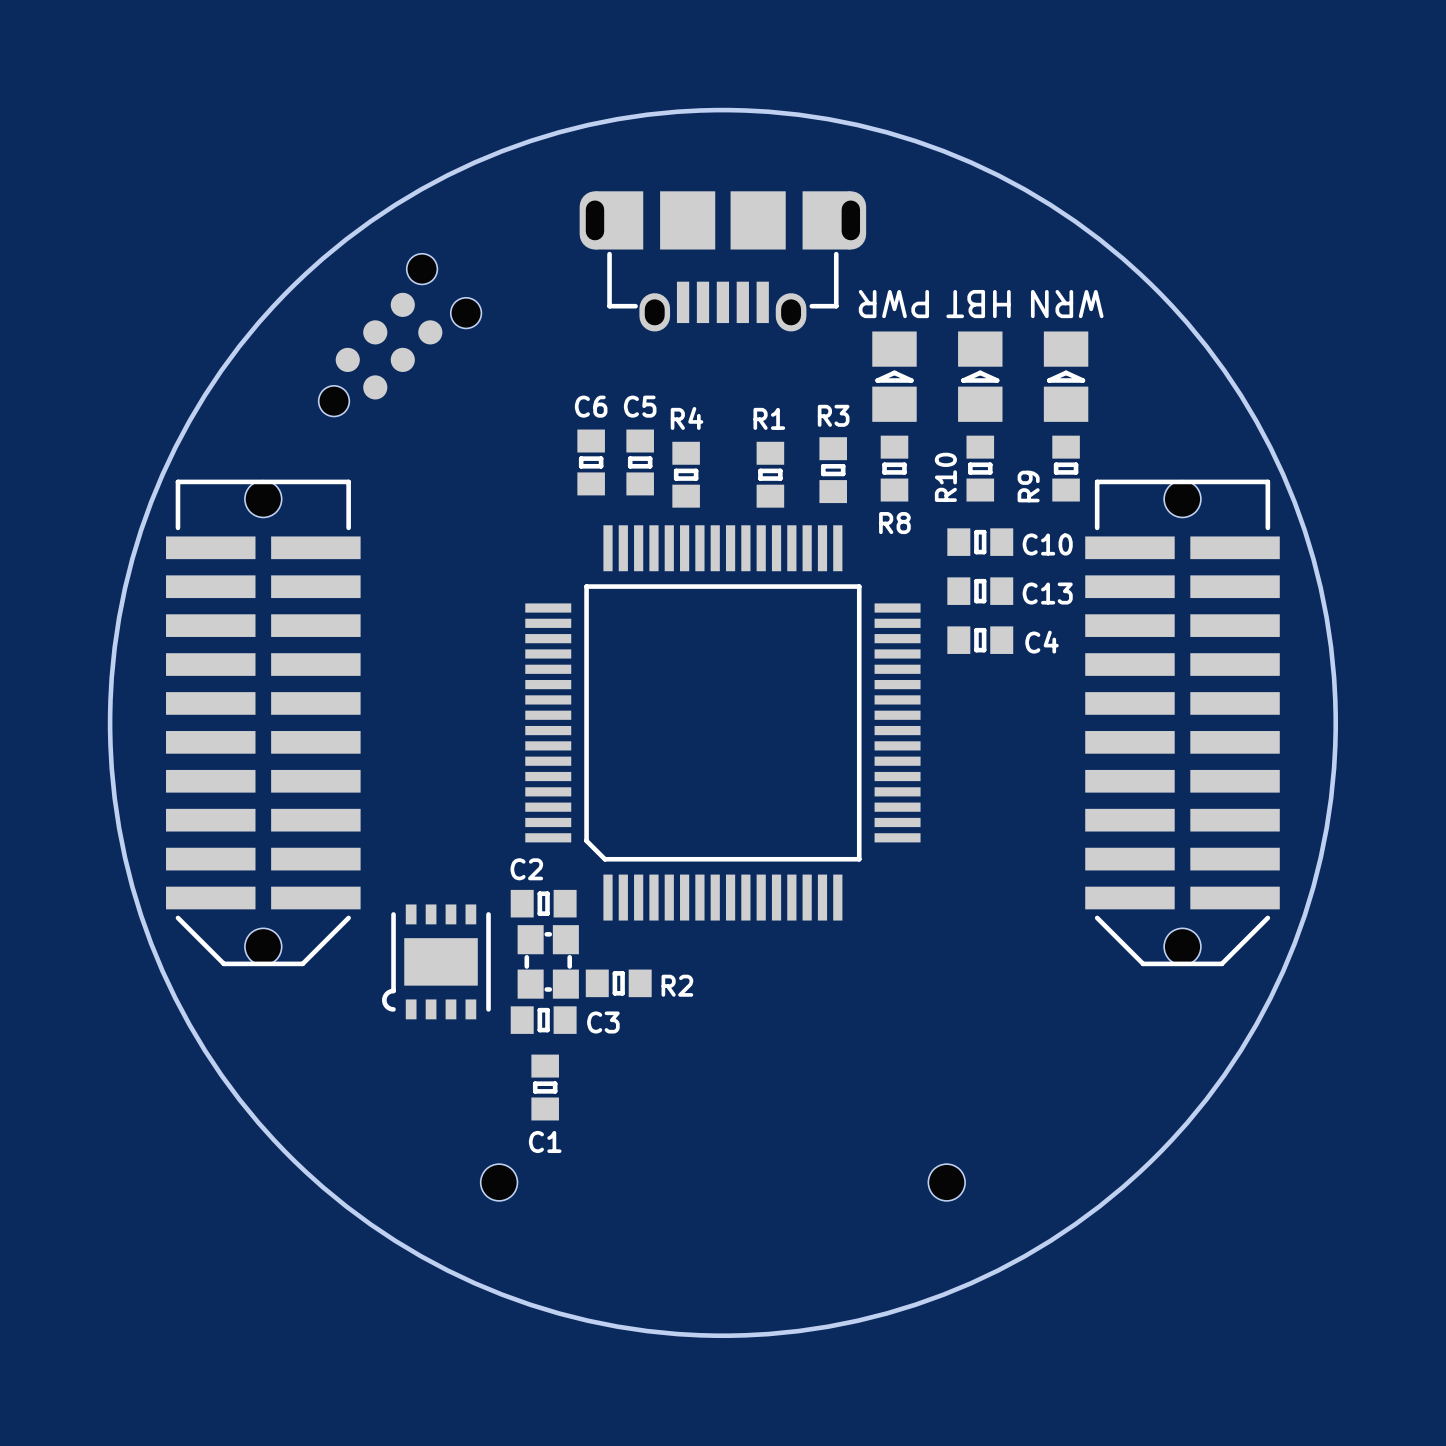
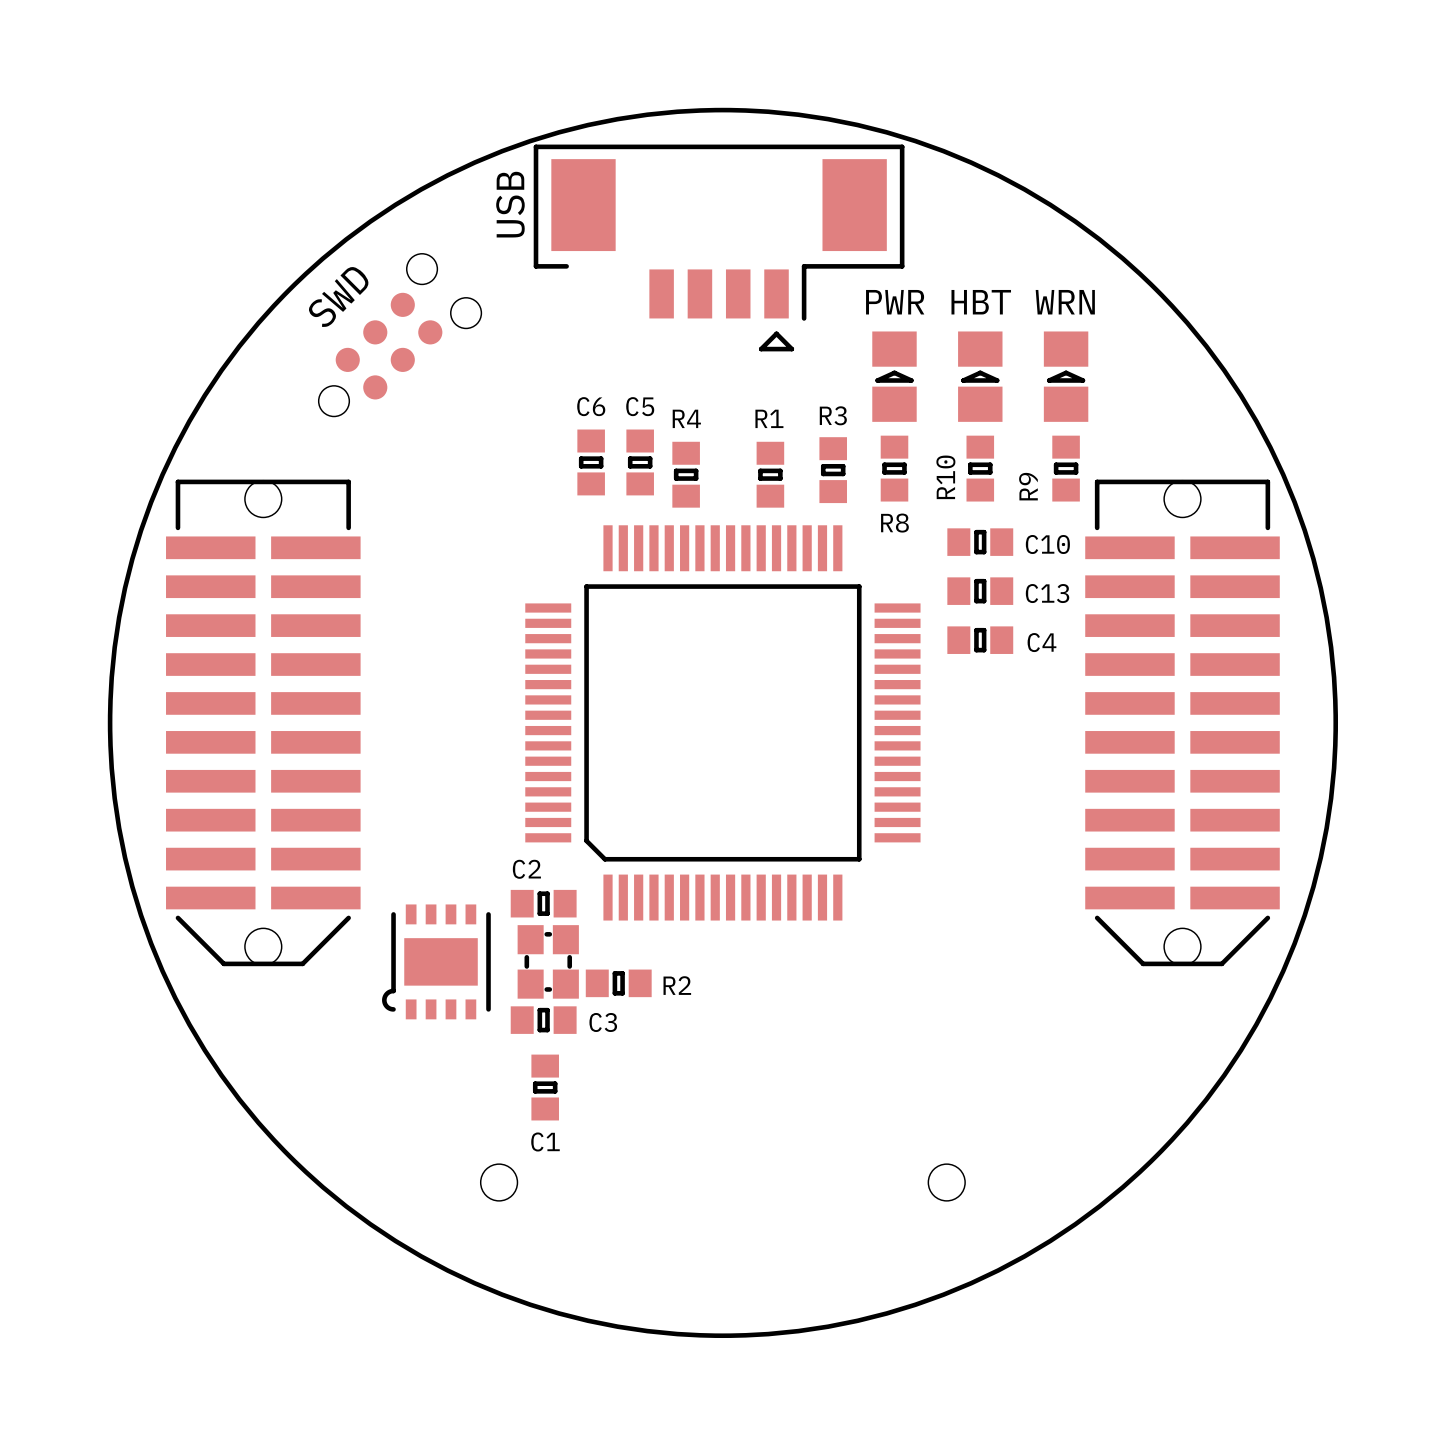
part footprint: [579, 191, 867, 332] -> [533, 144, 905, 352]
text: none -> USB (510, 204)
text: none -> SWD (338, 296)
text rotation: 0° (893, 304) -> 180° (895, 302)
text rotation: 0° (978, 304) -> 180° (981, 302)
text rotation: 0° (1067, 304) -> 180° (1065, 302)

